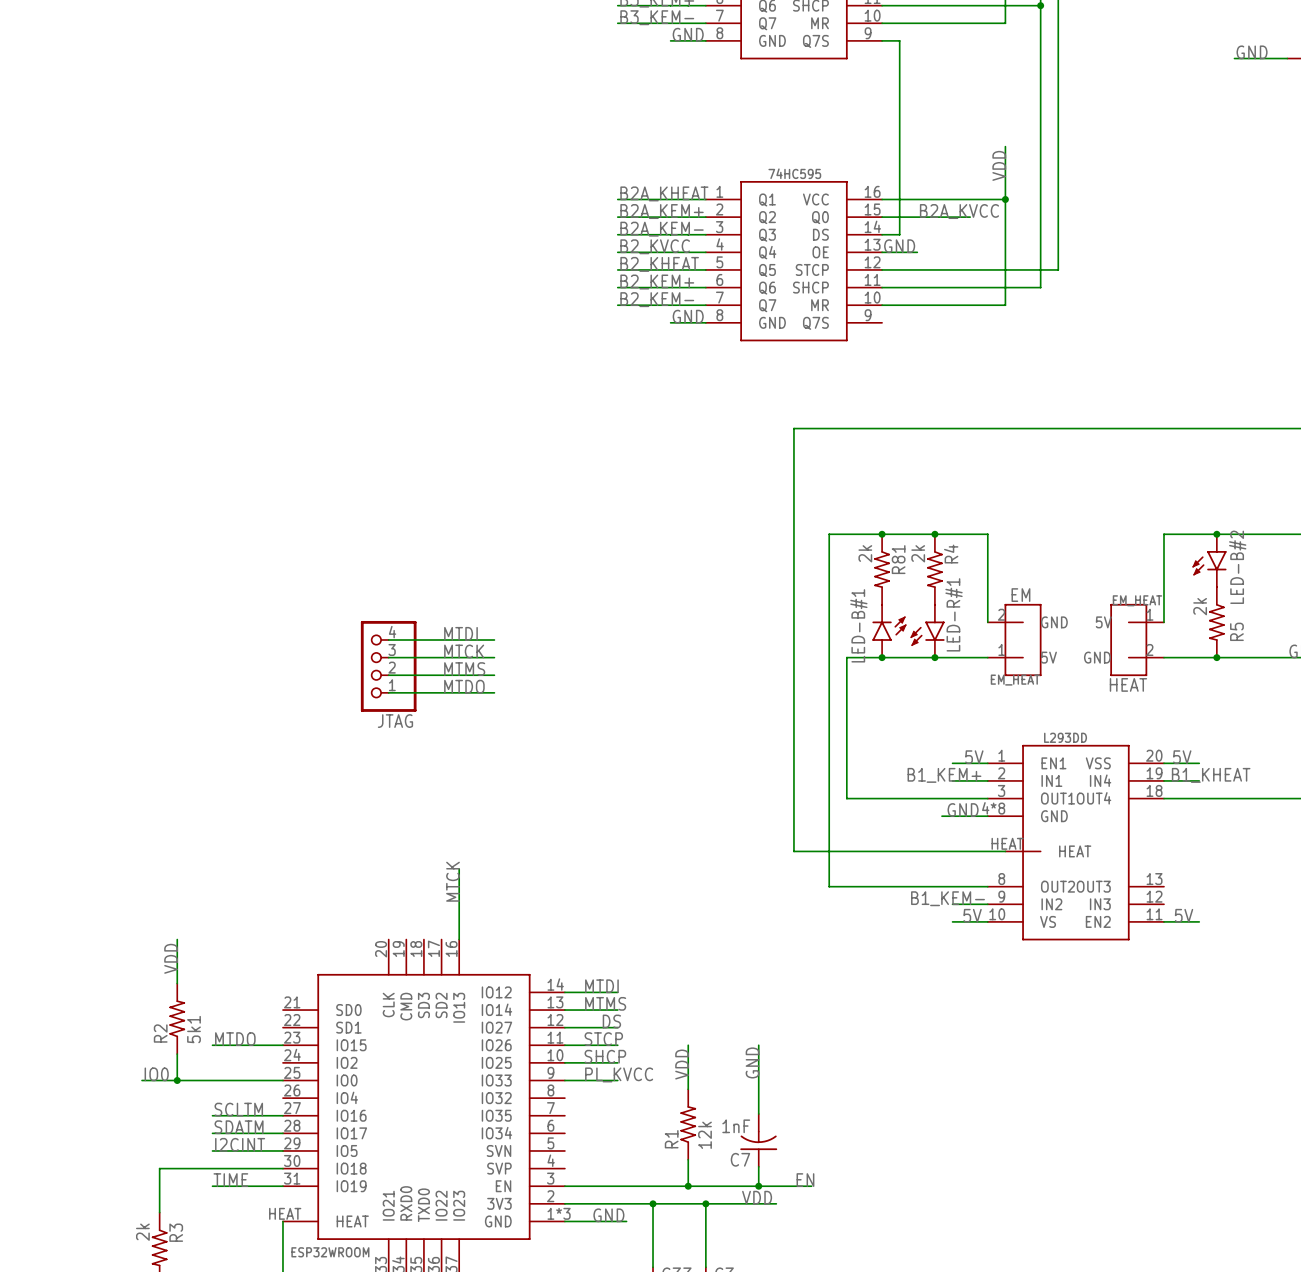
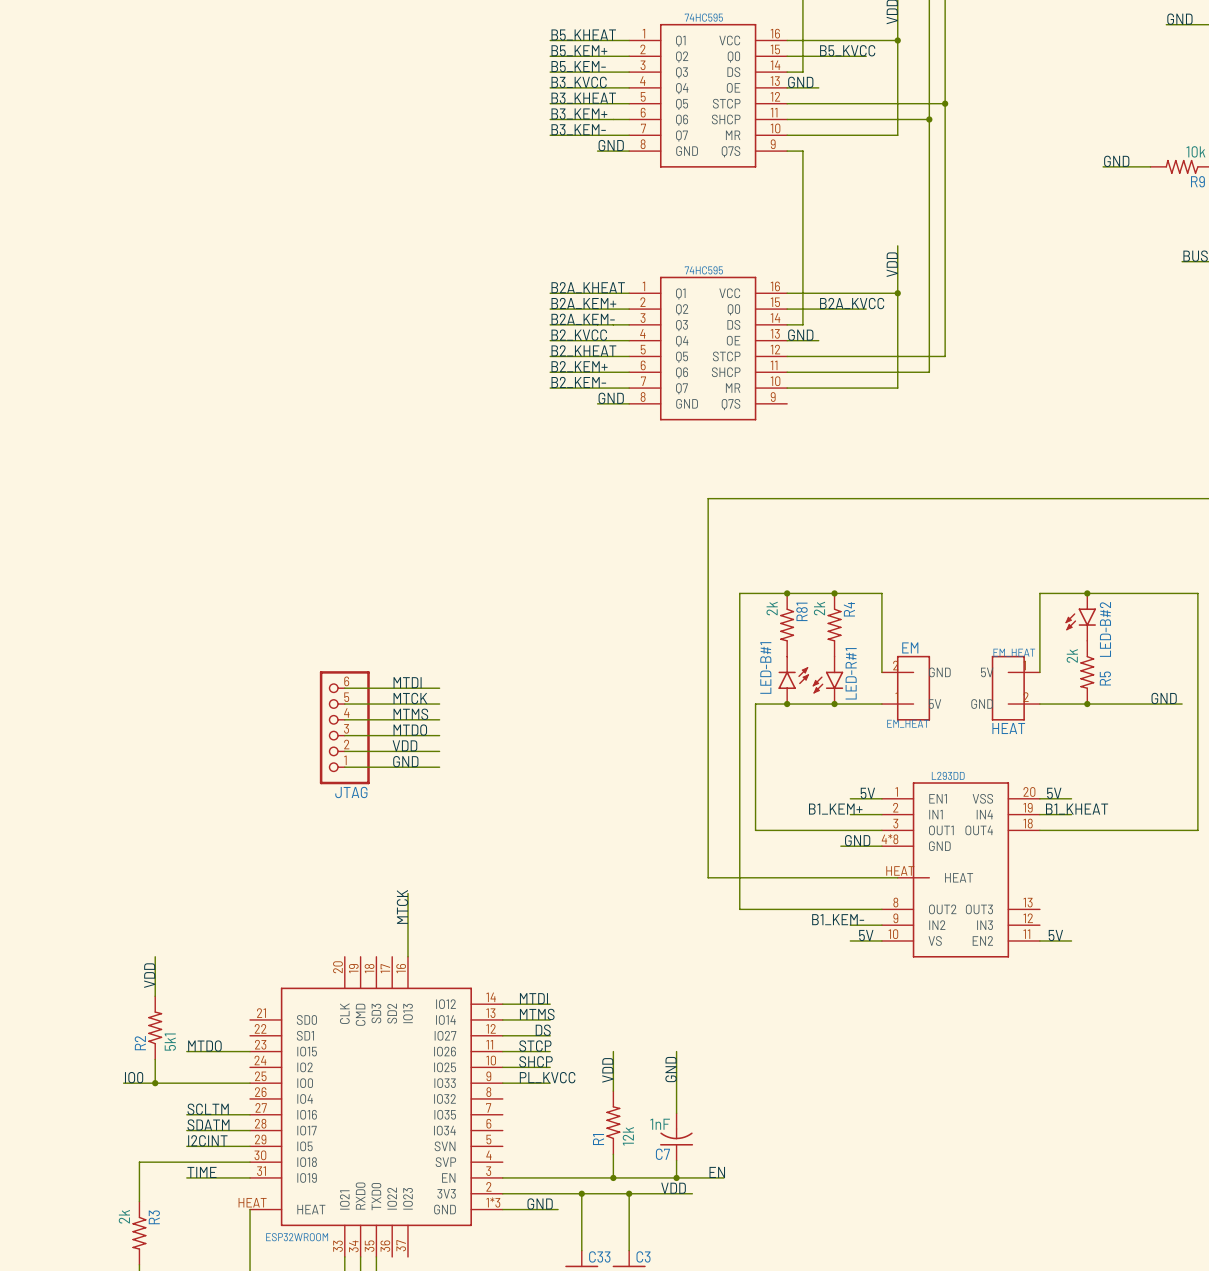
JTAG: (388, 666) -> none
JTAG: none -> (344, 727)
label: none -> VDD (404, 745)
wire: none -> (344, 751) (439, 751)
label: none -> GND (405, 761)
wire: none -> (344, 767) (439, 767)

